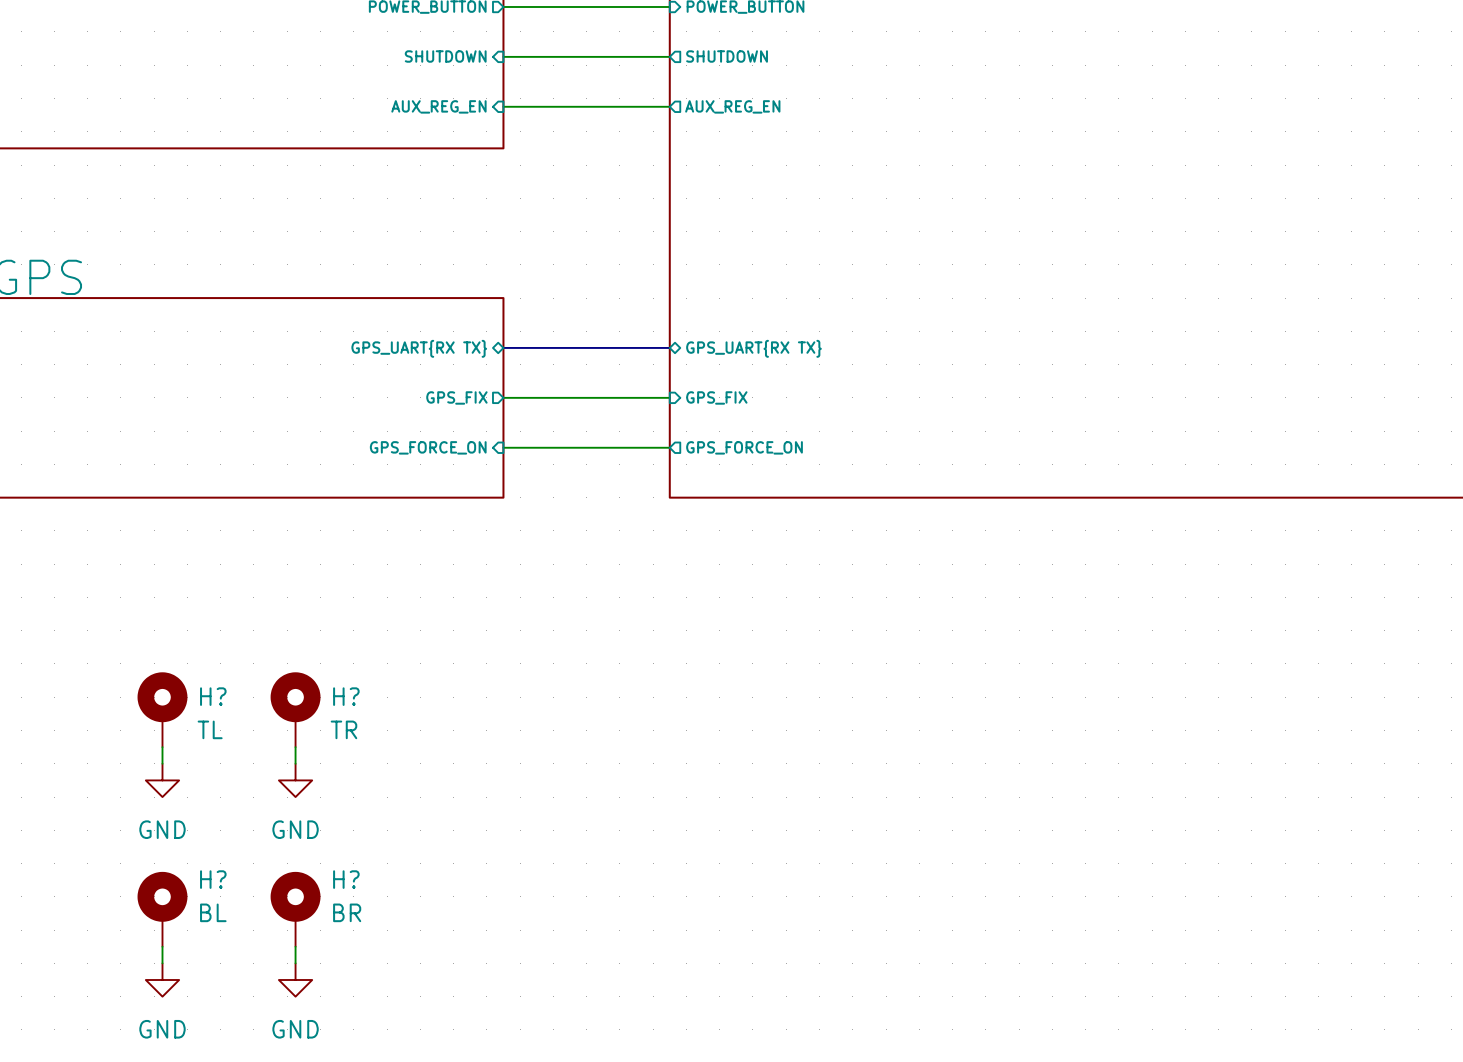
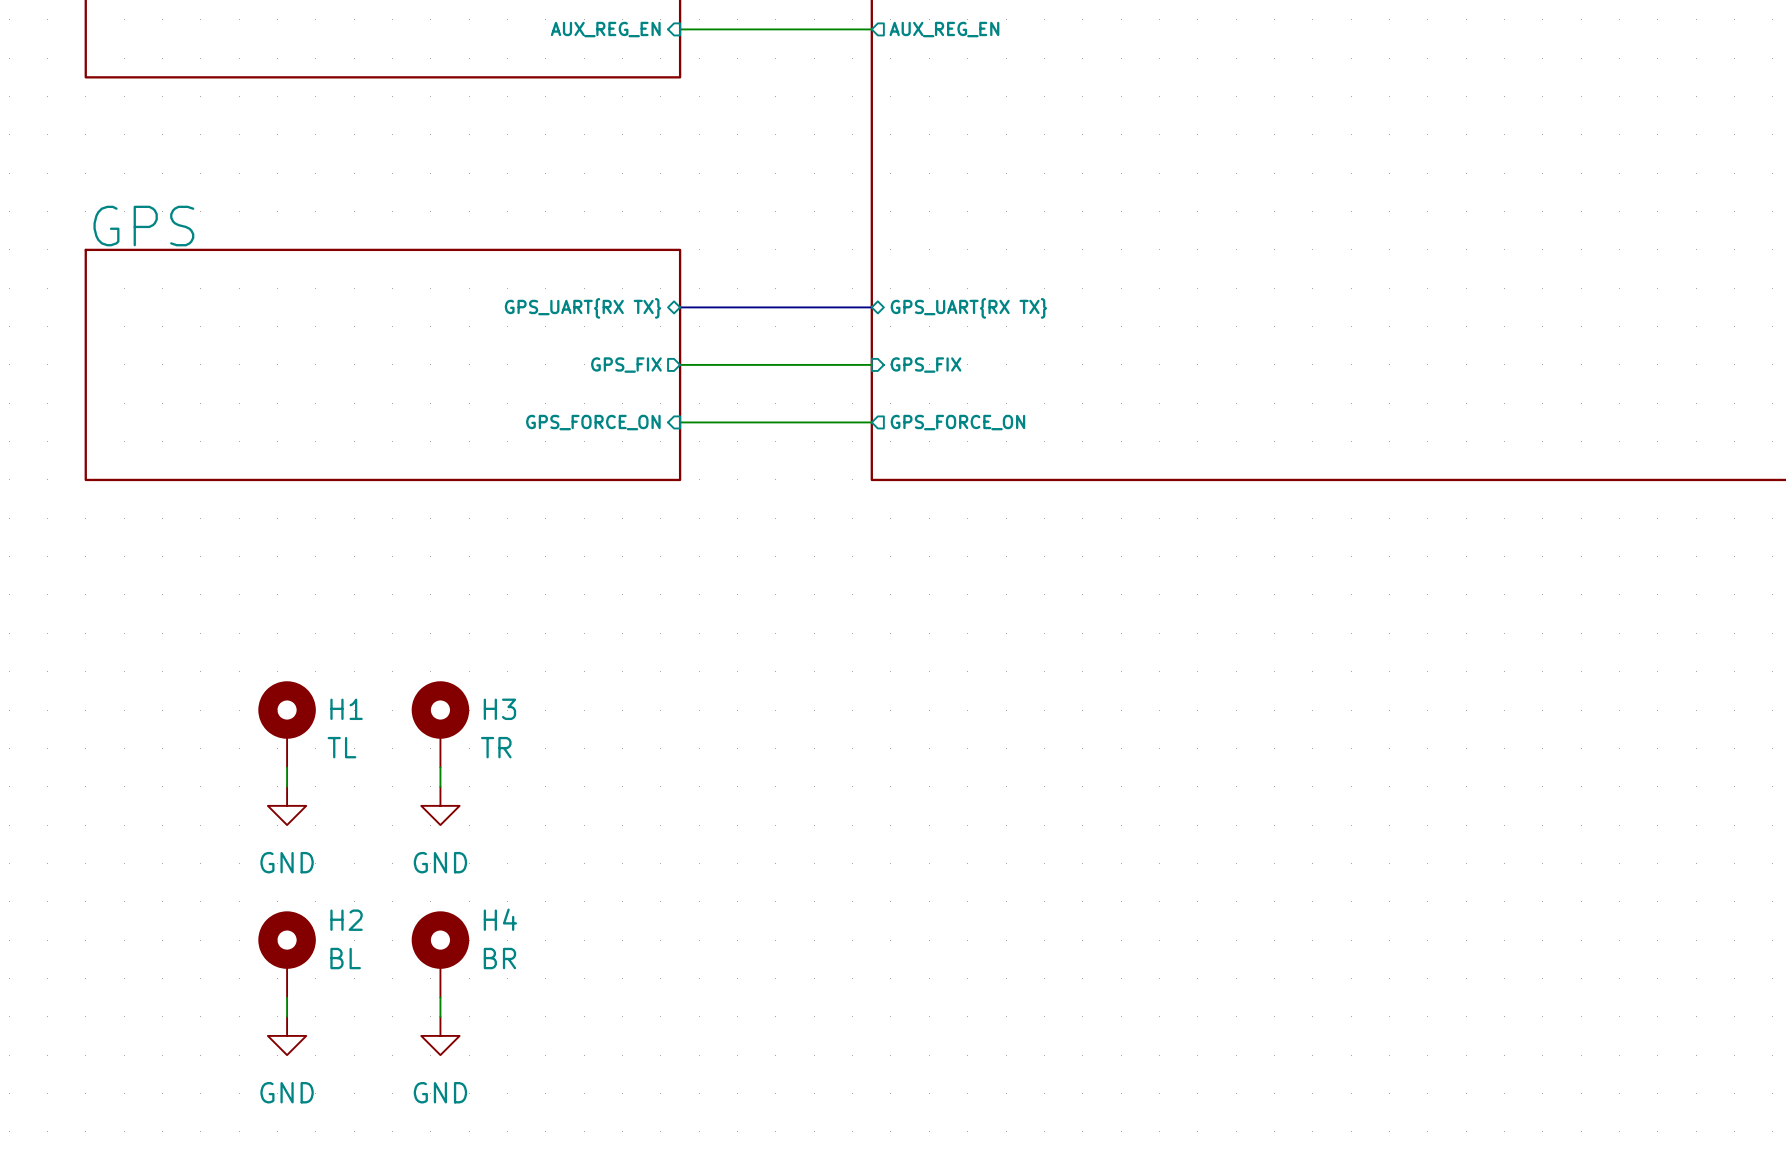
H? name: H? (213, 696) -> H1 (346, 709)
H? name: H? (346, 696) -> H3 (499, 709)
H? name: H? (213, 879) -> H2 (346, 920)
H? name: H? (346, 879) -> H4 (500, 919)

